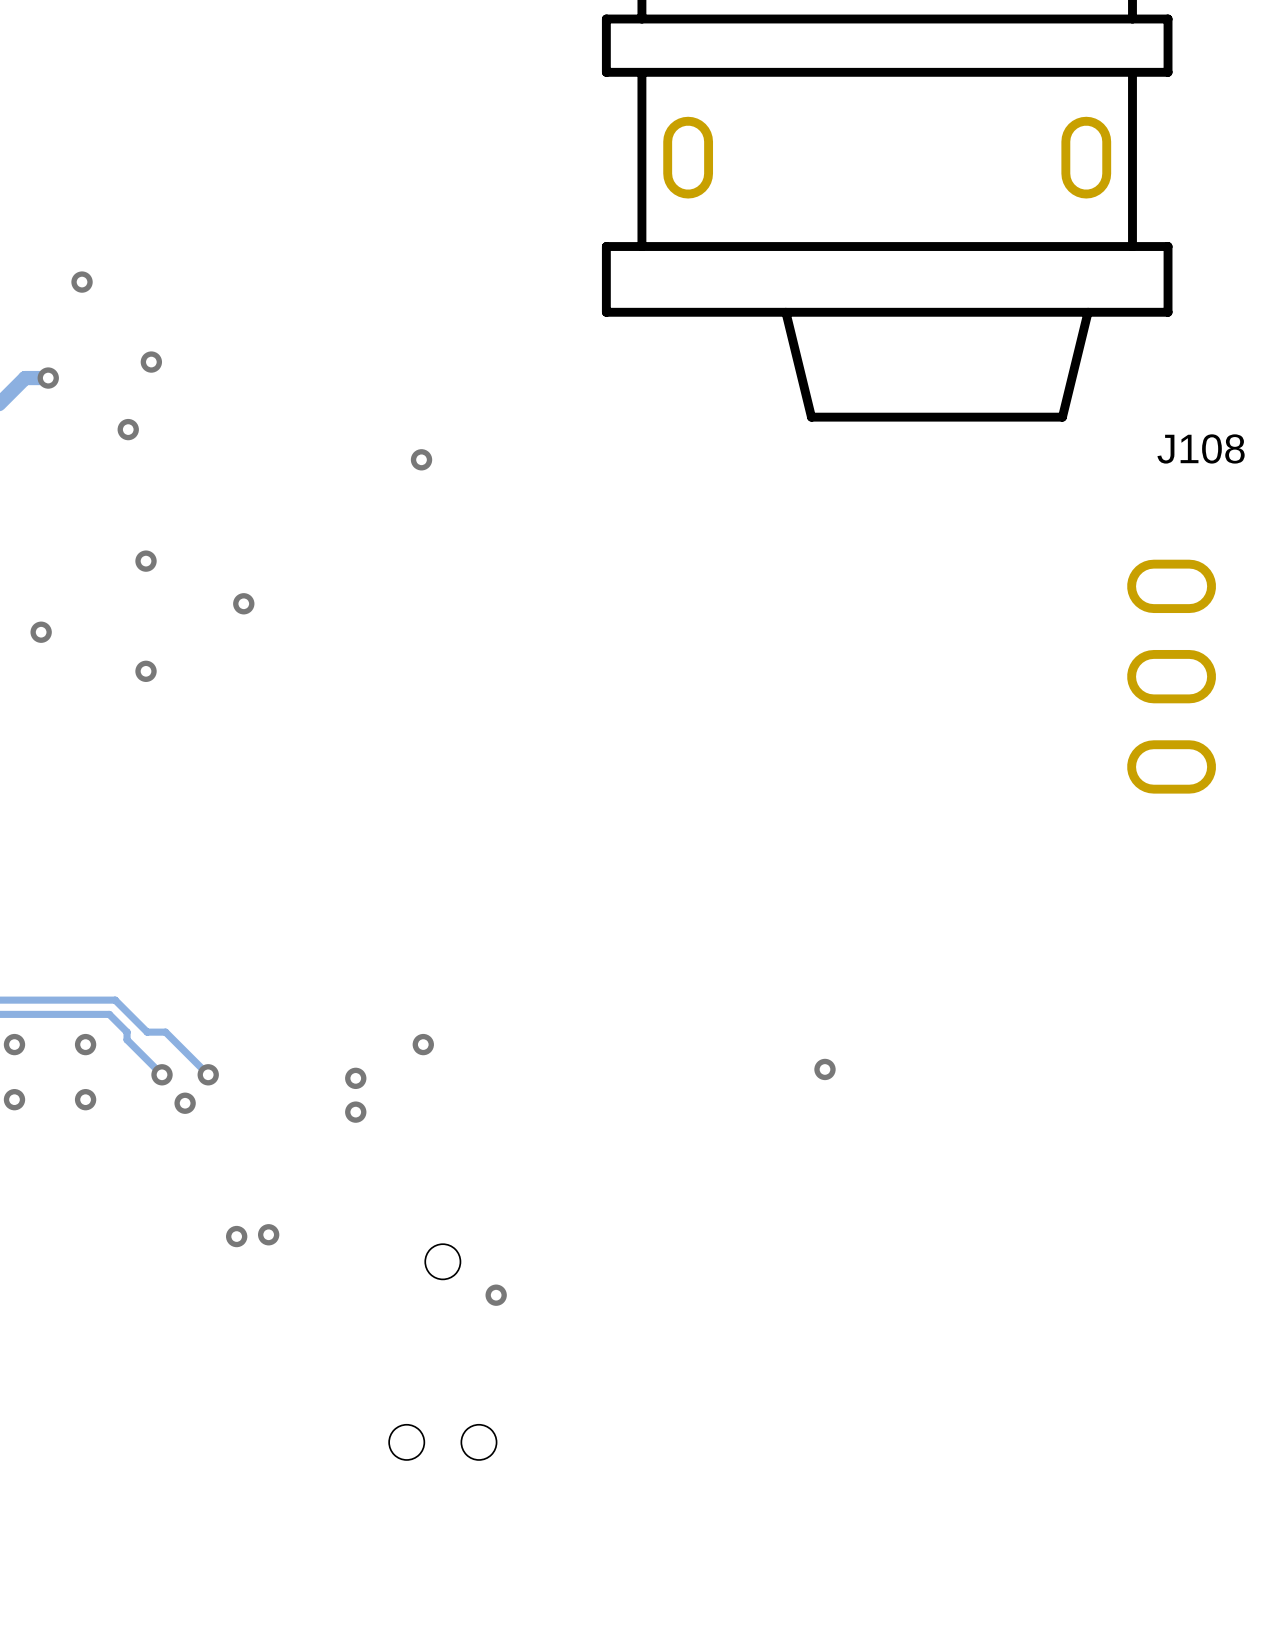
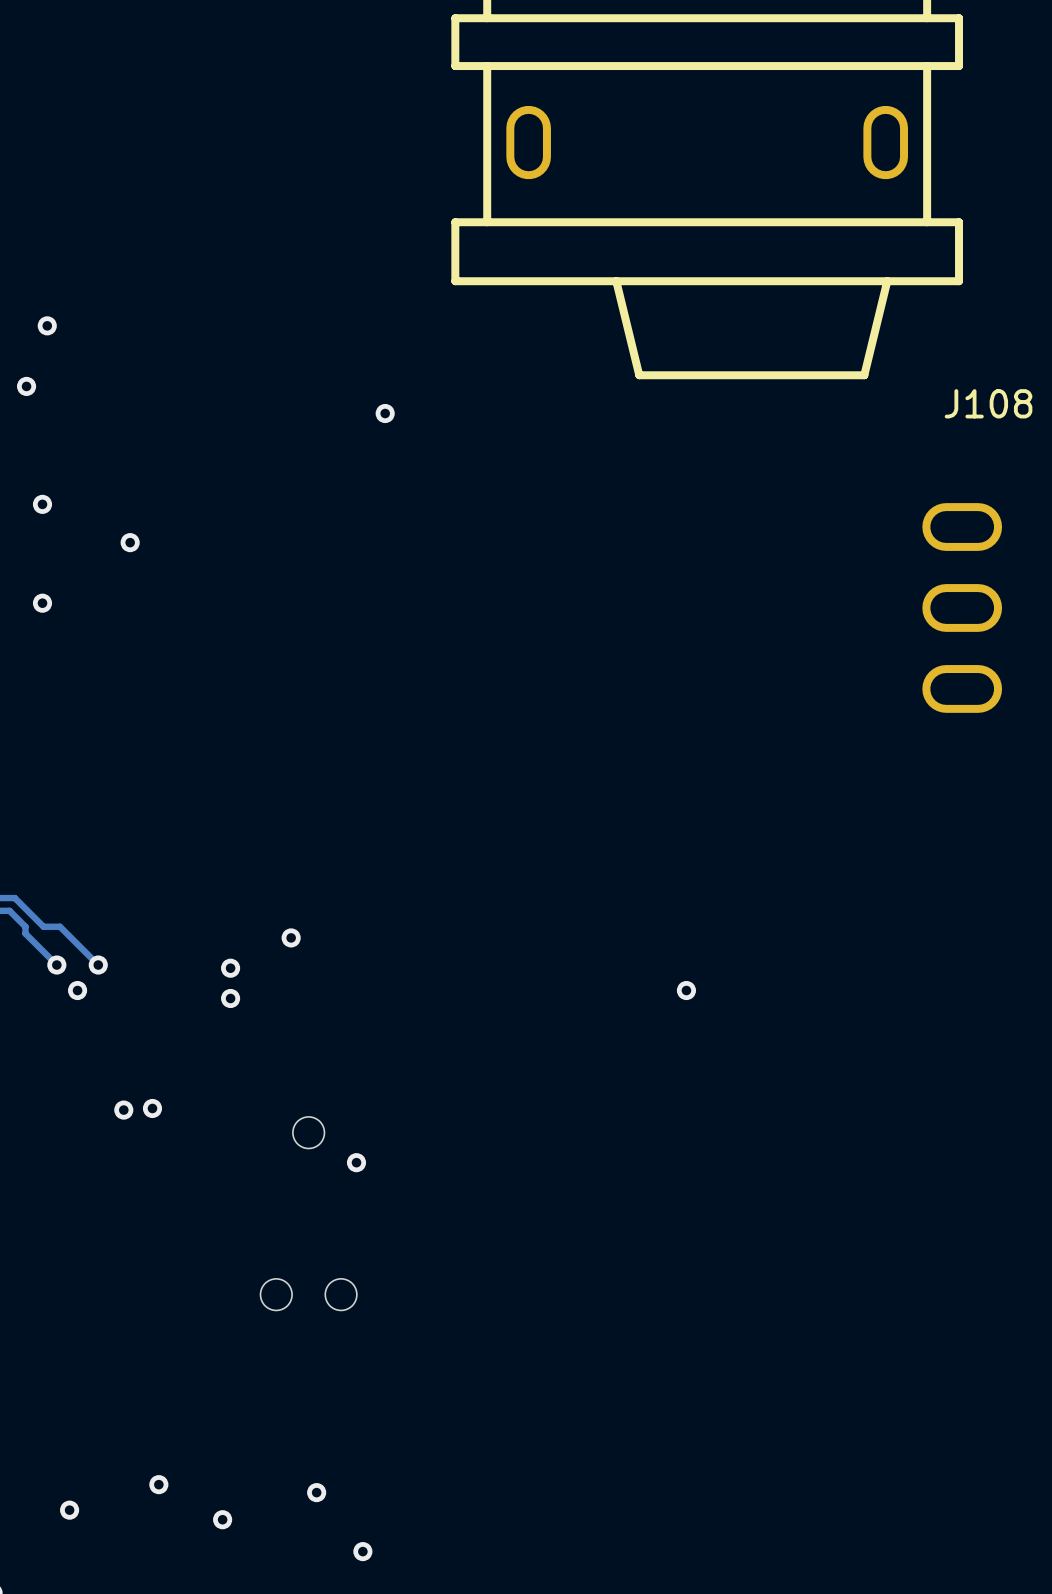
via position: (421, 459) -> (385, 413)
via position: (824, 1069) -> (686, 990)

